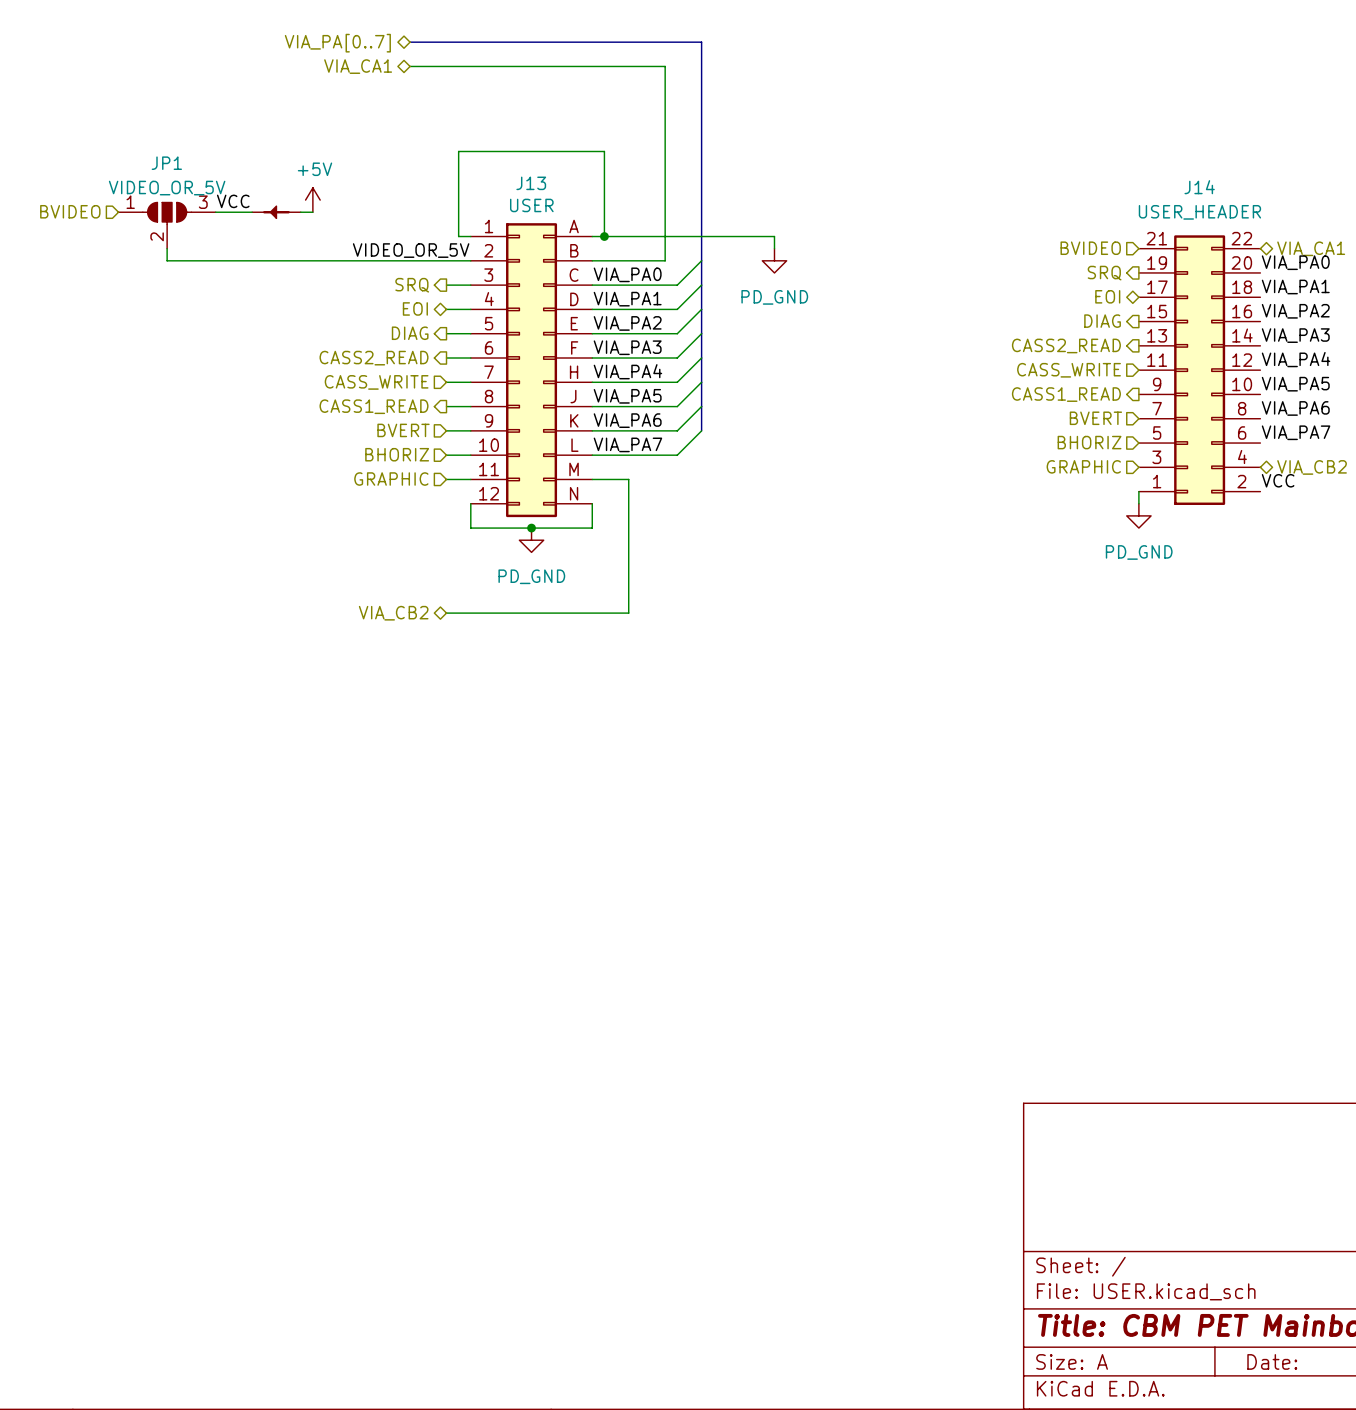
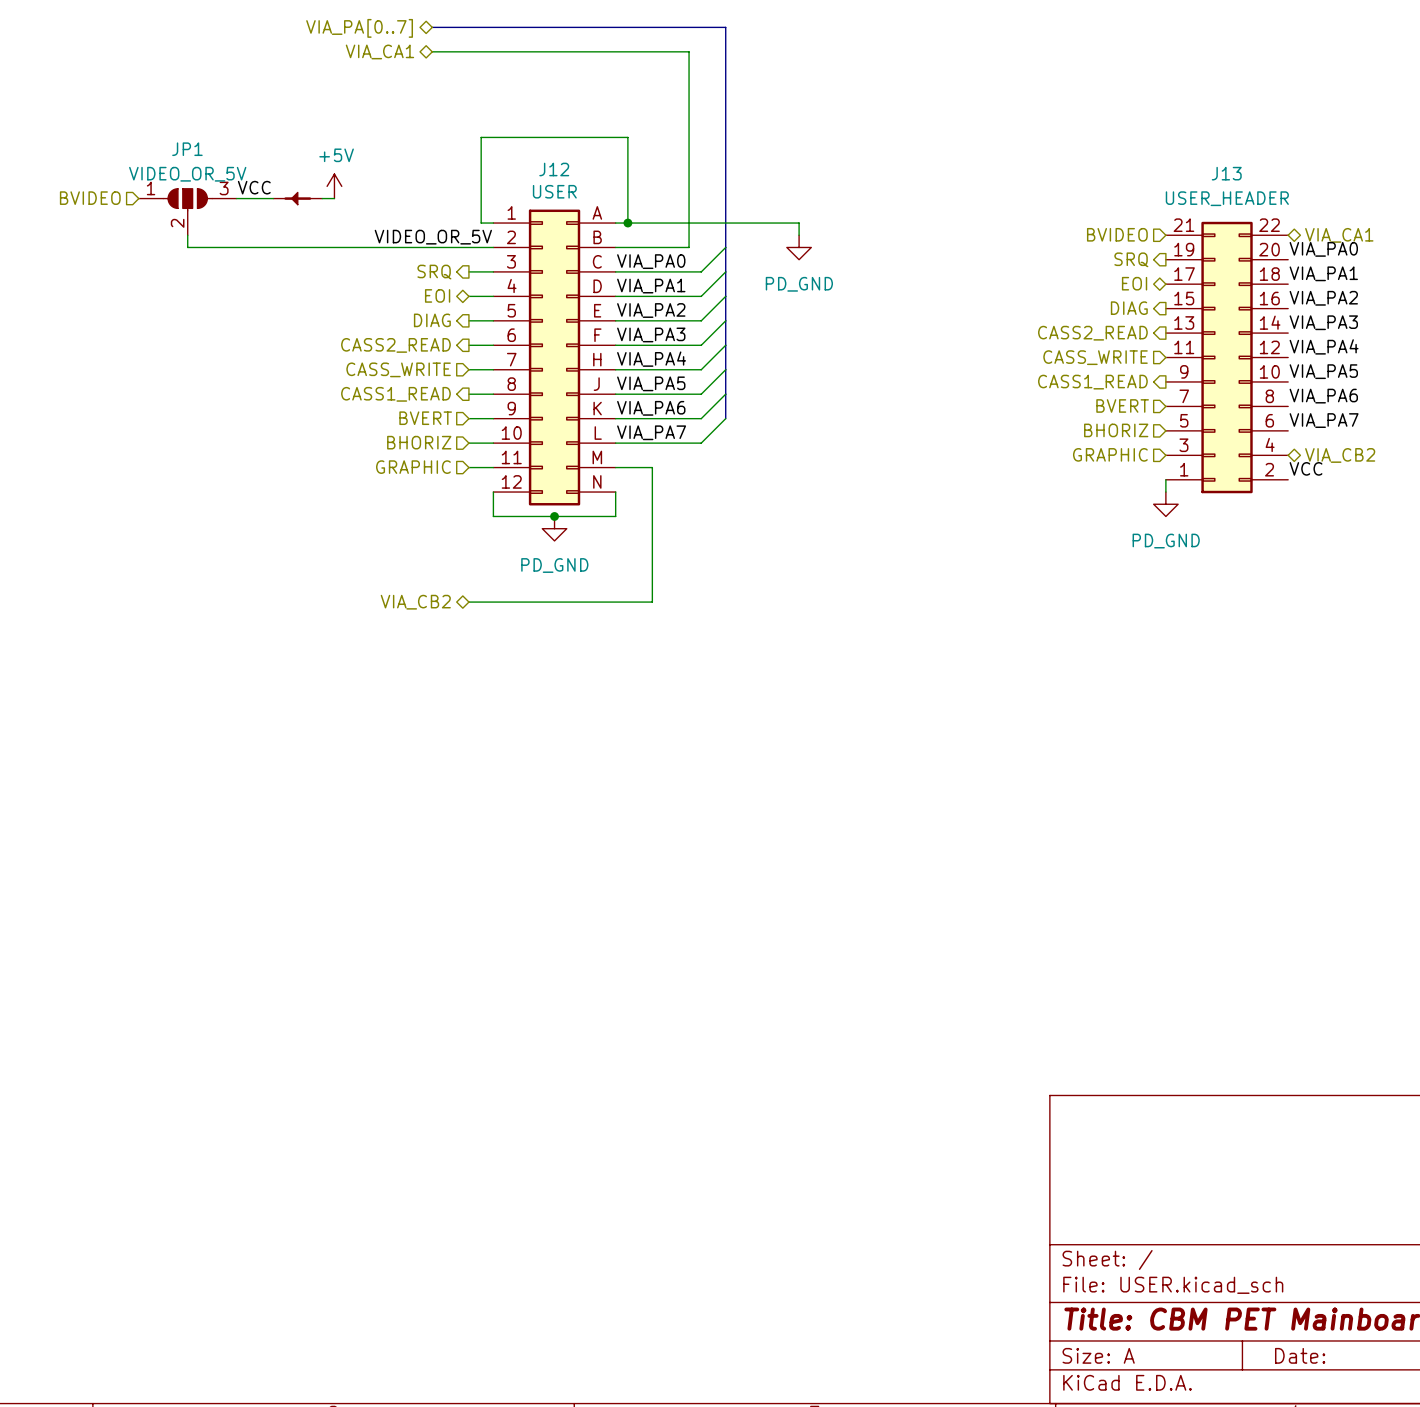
J13 name: J13 (531, 183) -> J12 (554, 169)
J14 name: J14 (1199, 187) -> J13 (1226, 173)

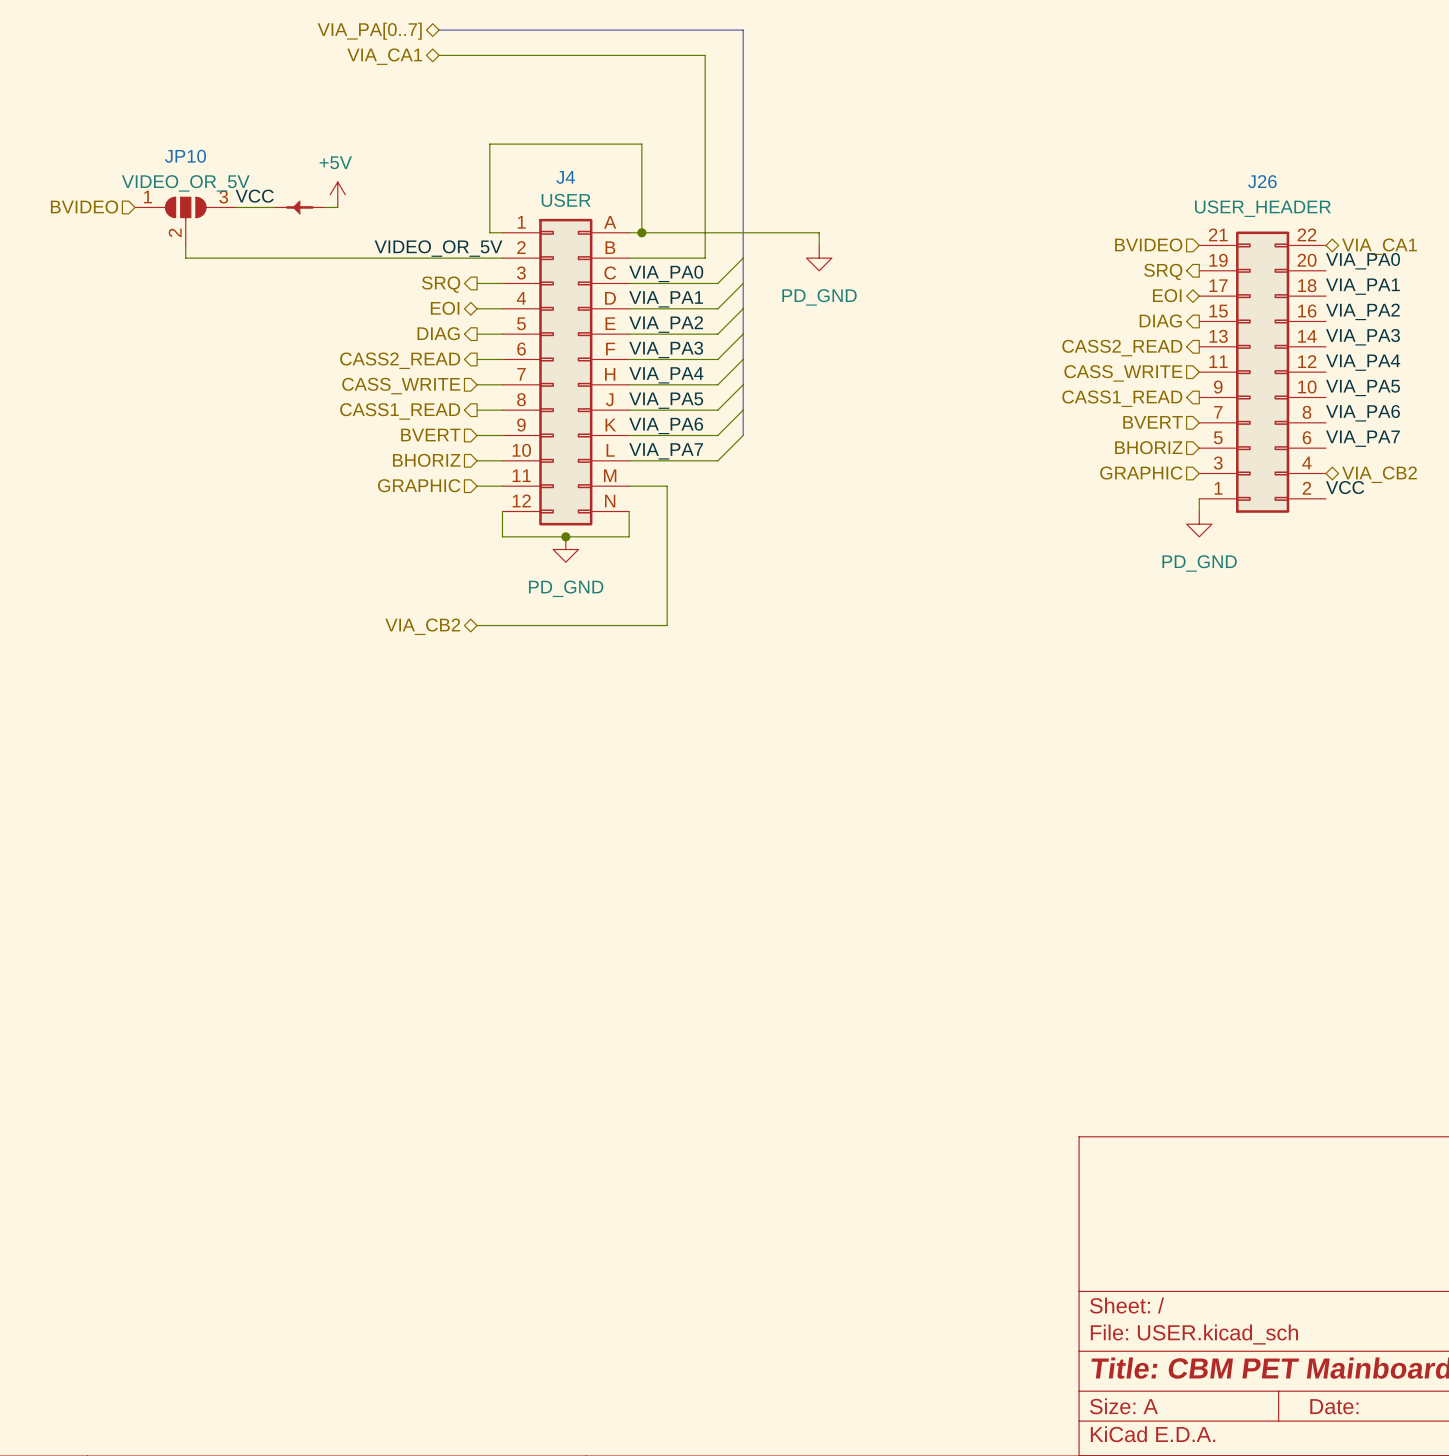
JP1 name: JP1 (187, 149) -> JP10 (185, 156)
J12 name: J12 (554, 169) -> J4 (565, 177)
J13 name: J13 (1226, 173) -> J26 (1262, 181)

